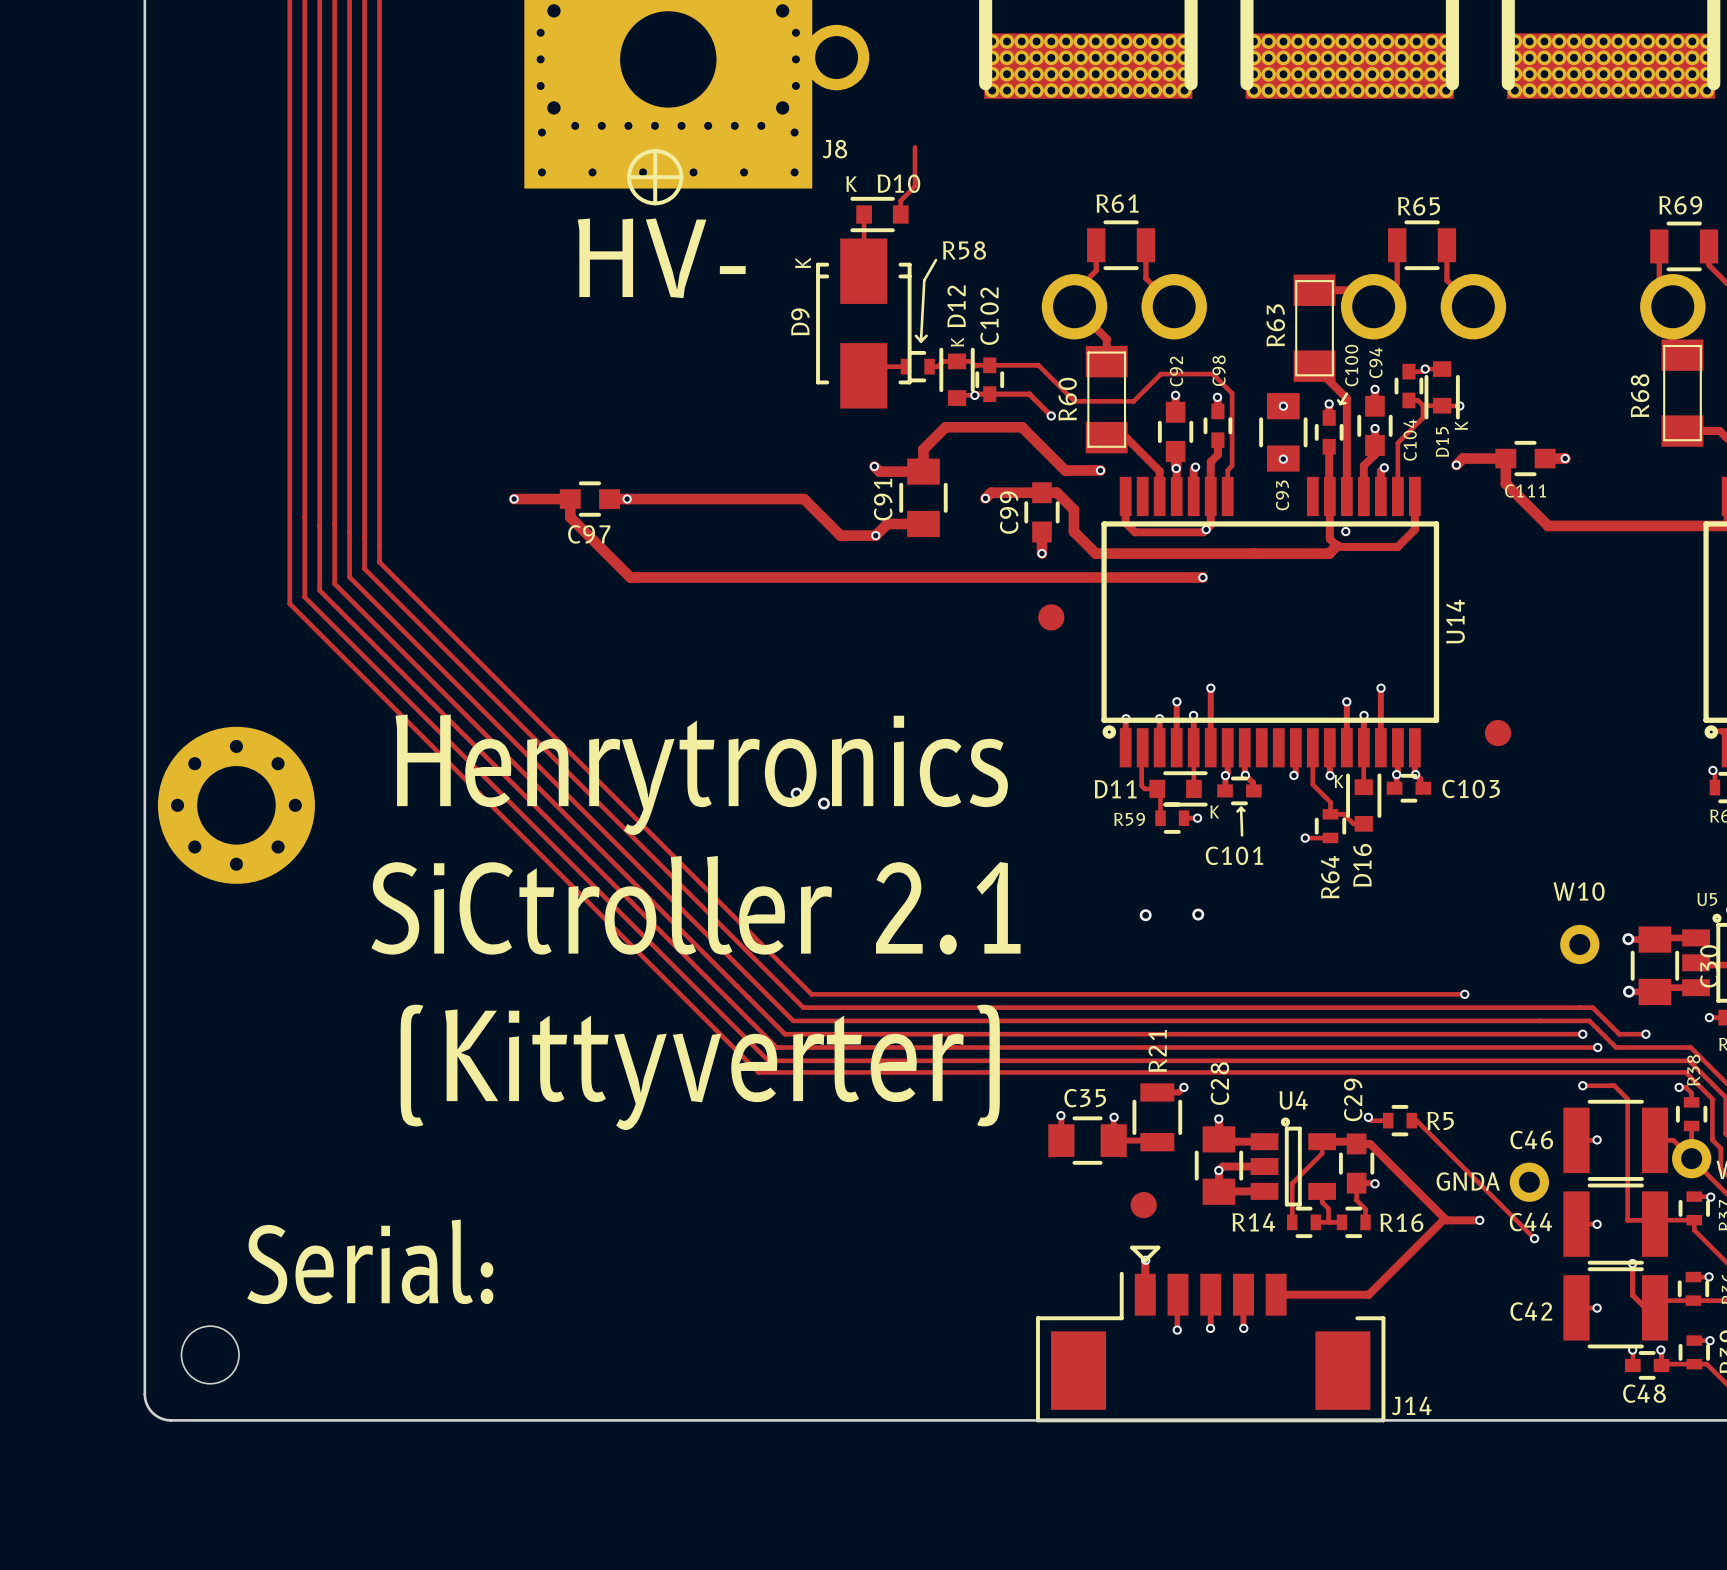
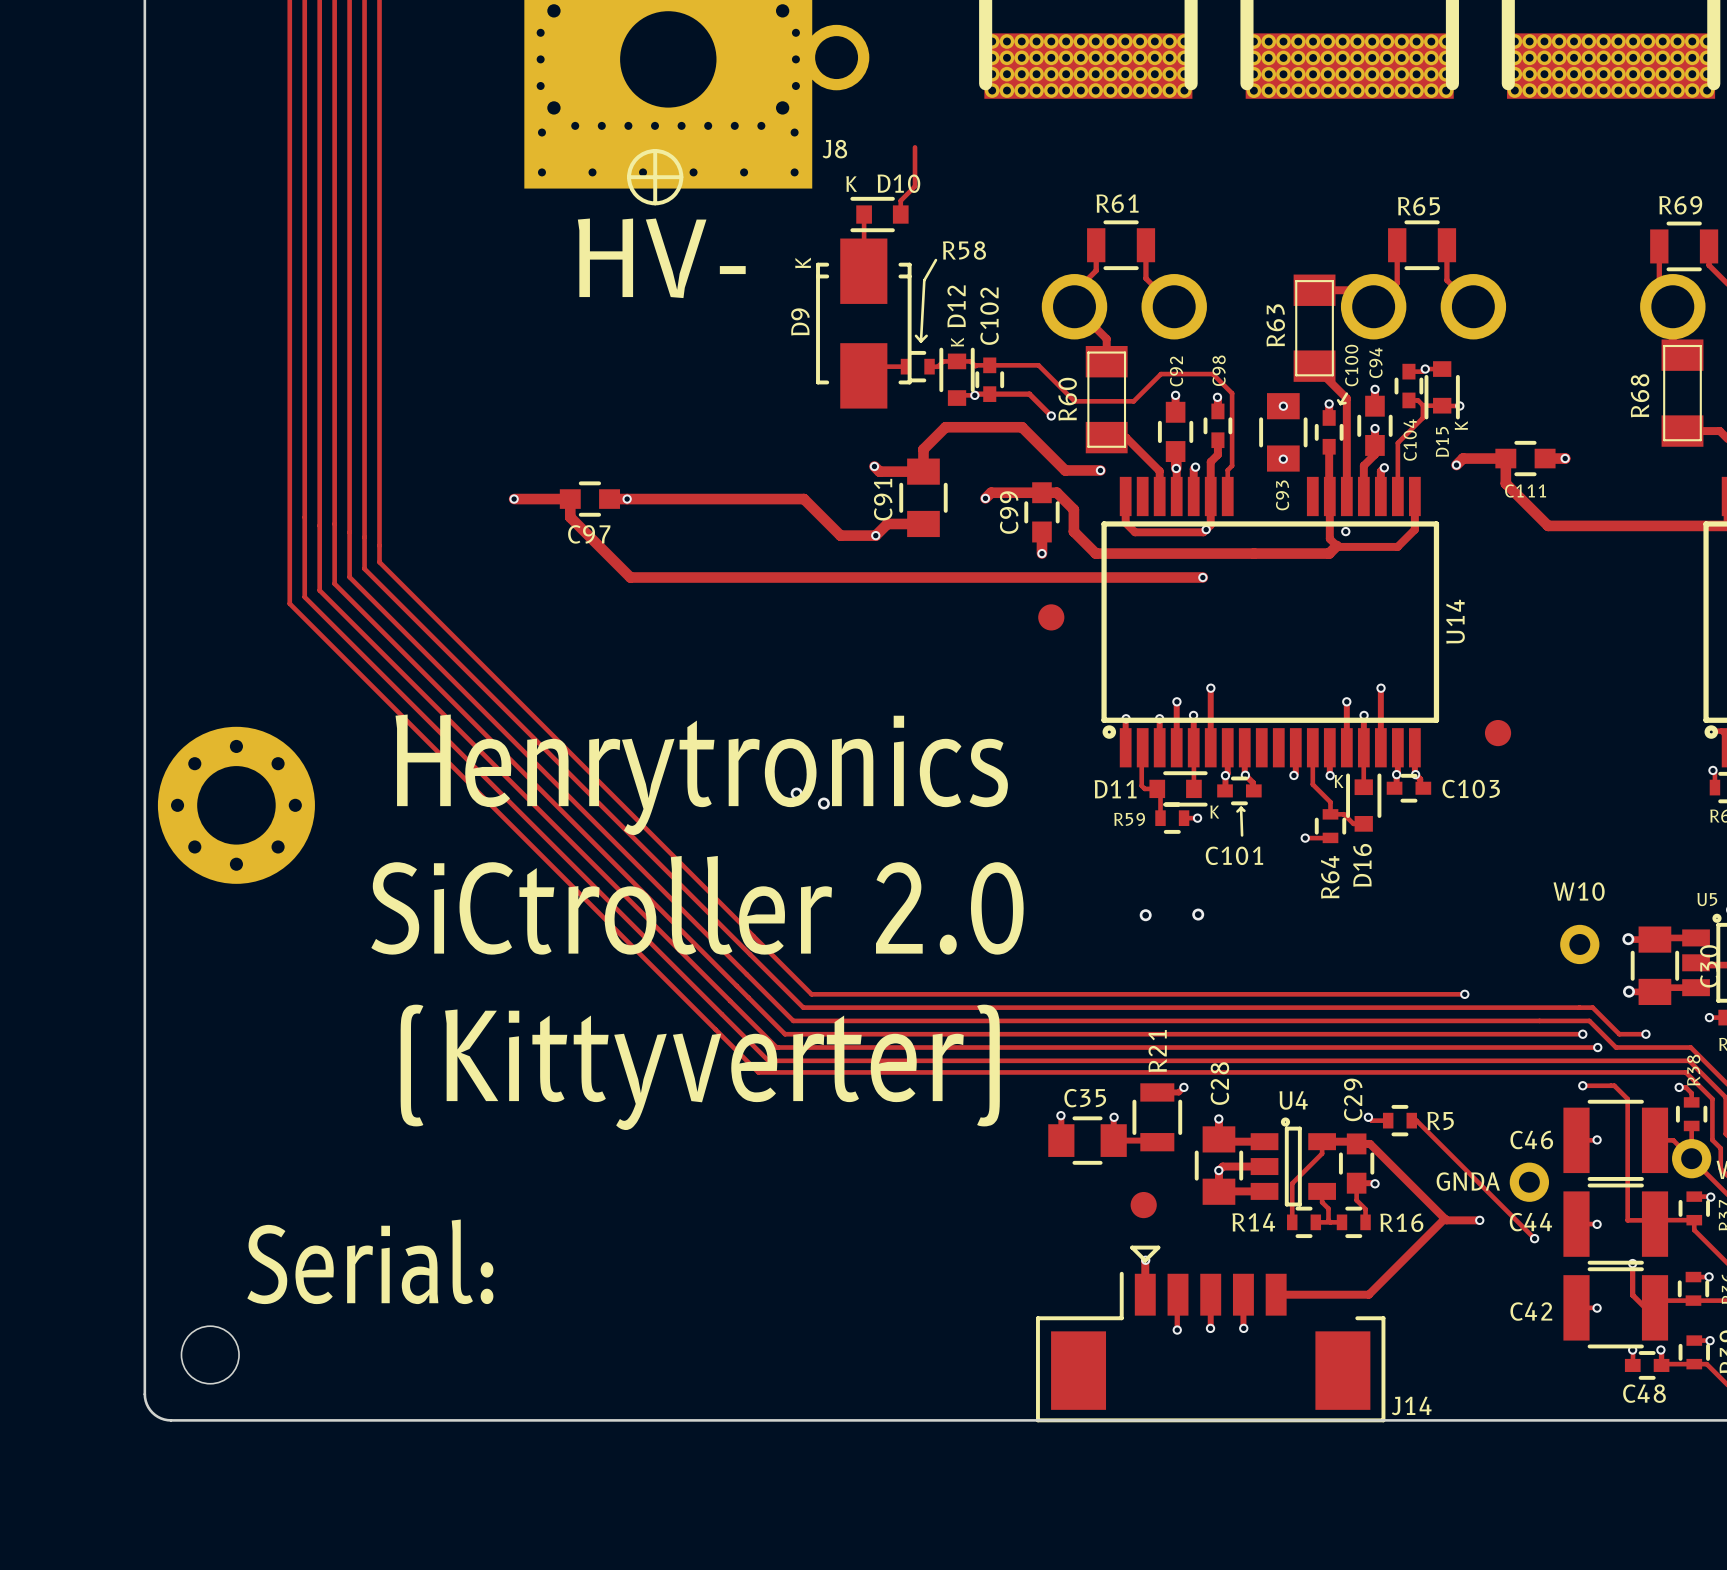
text: SiCtroller 2.1 (695, 905) -> SiCtroller 2.0 (697, 905)

